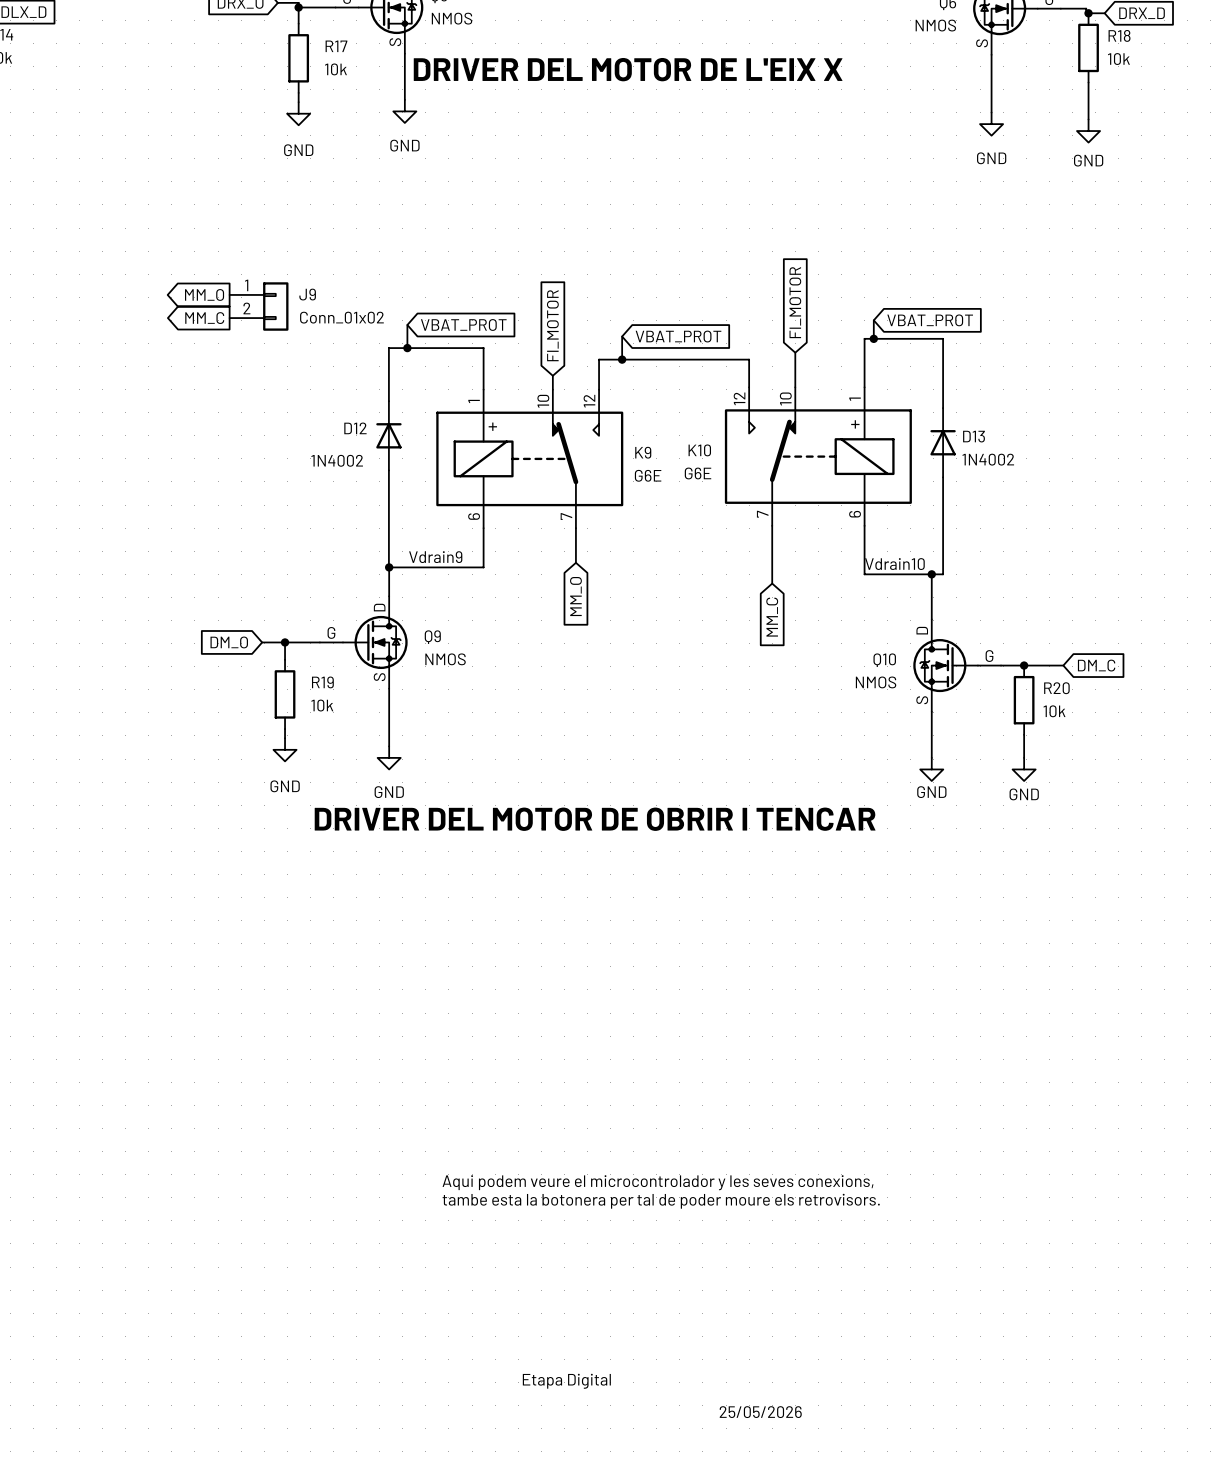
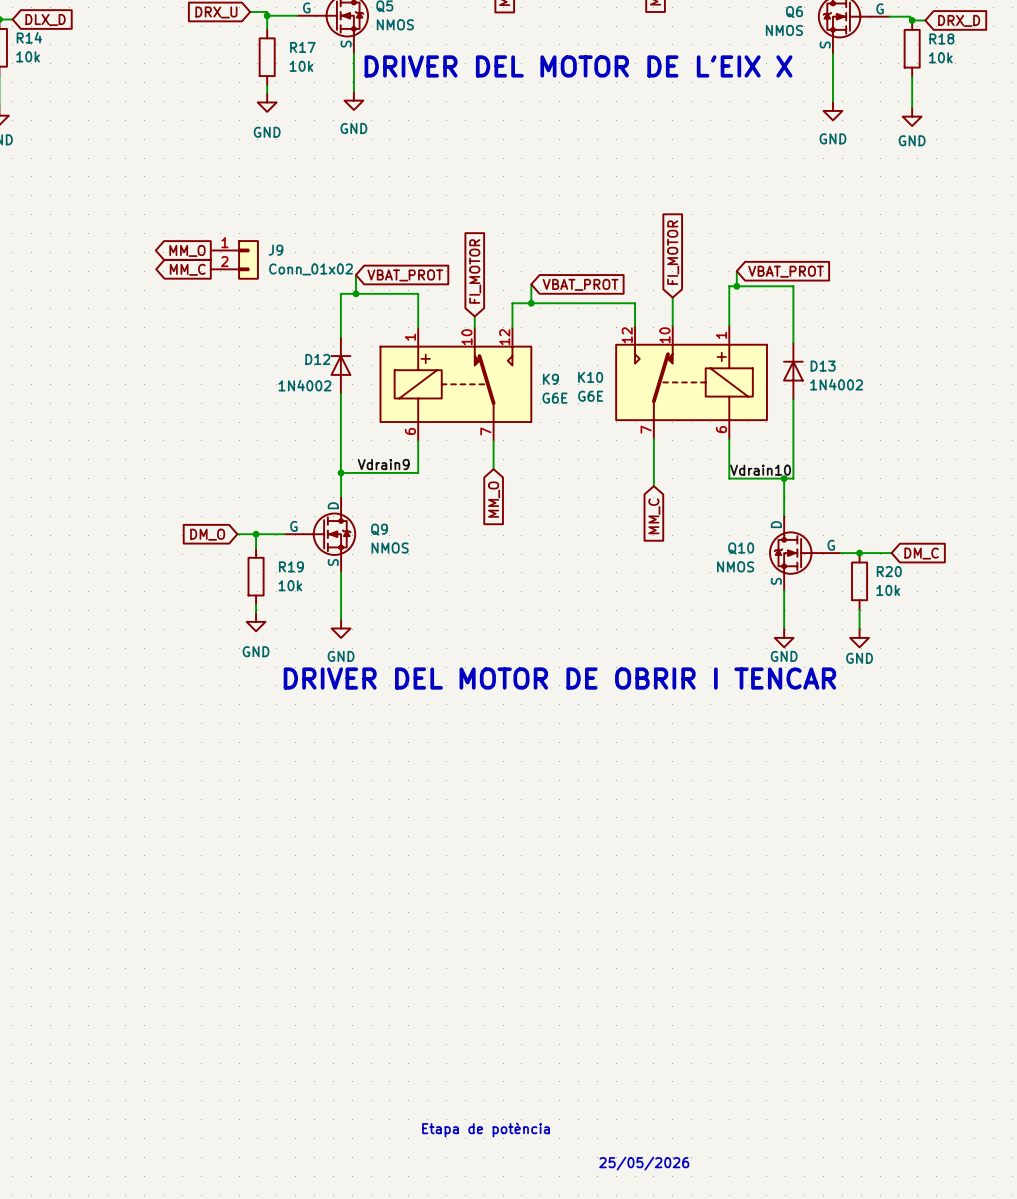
text: Aqui podem veure el microcontrolador y les seves conexions, (658, 1182) -> none
text: tambe esta la botonera per tal de poder moure els retrovisors. (661, 1201) -> none
text: none -> Etapa de potència (486, 1129)
text: Etapa Digital (566, 1381) -> none

